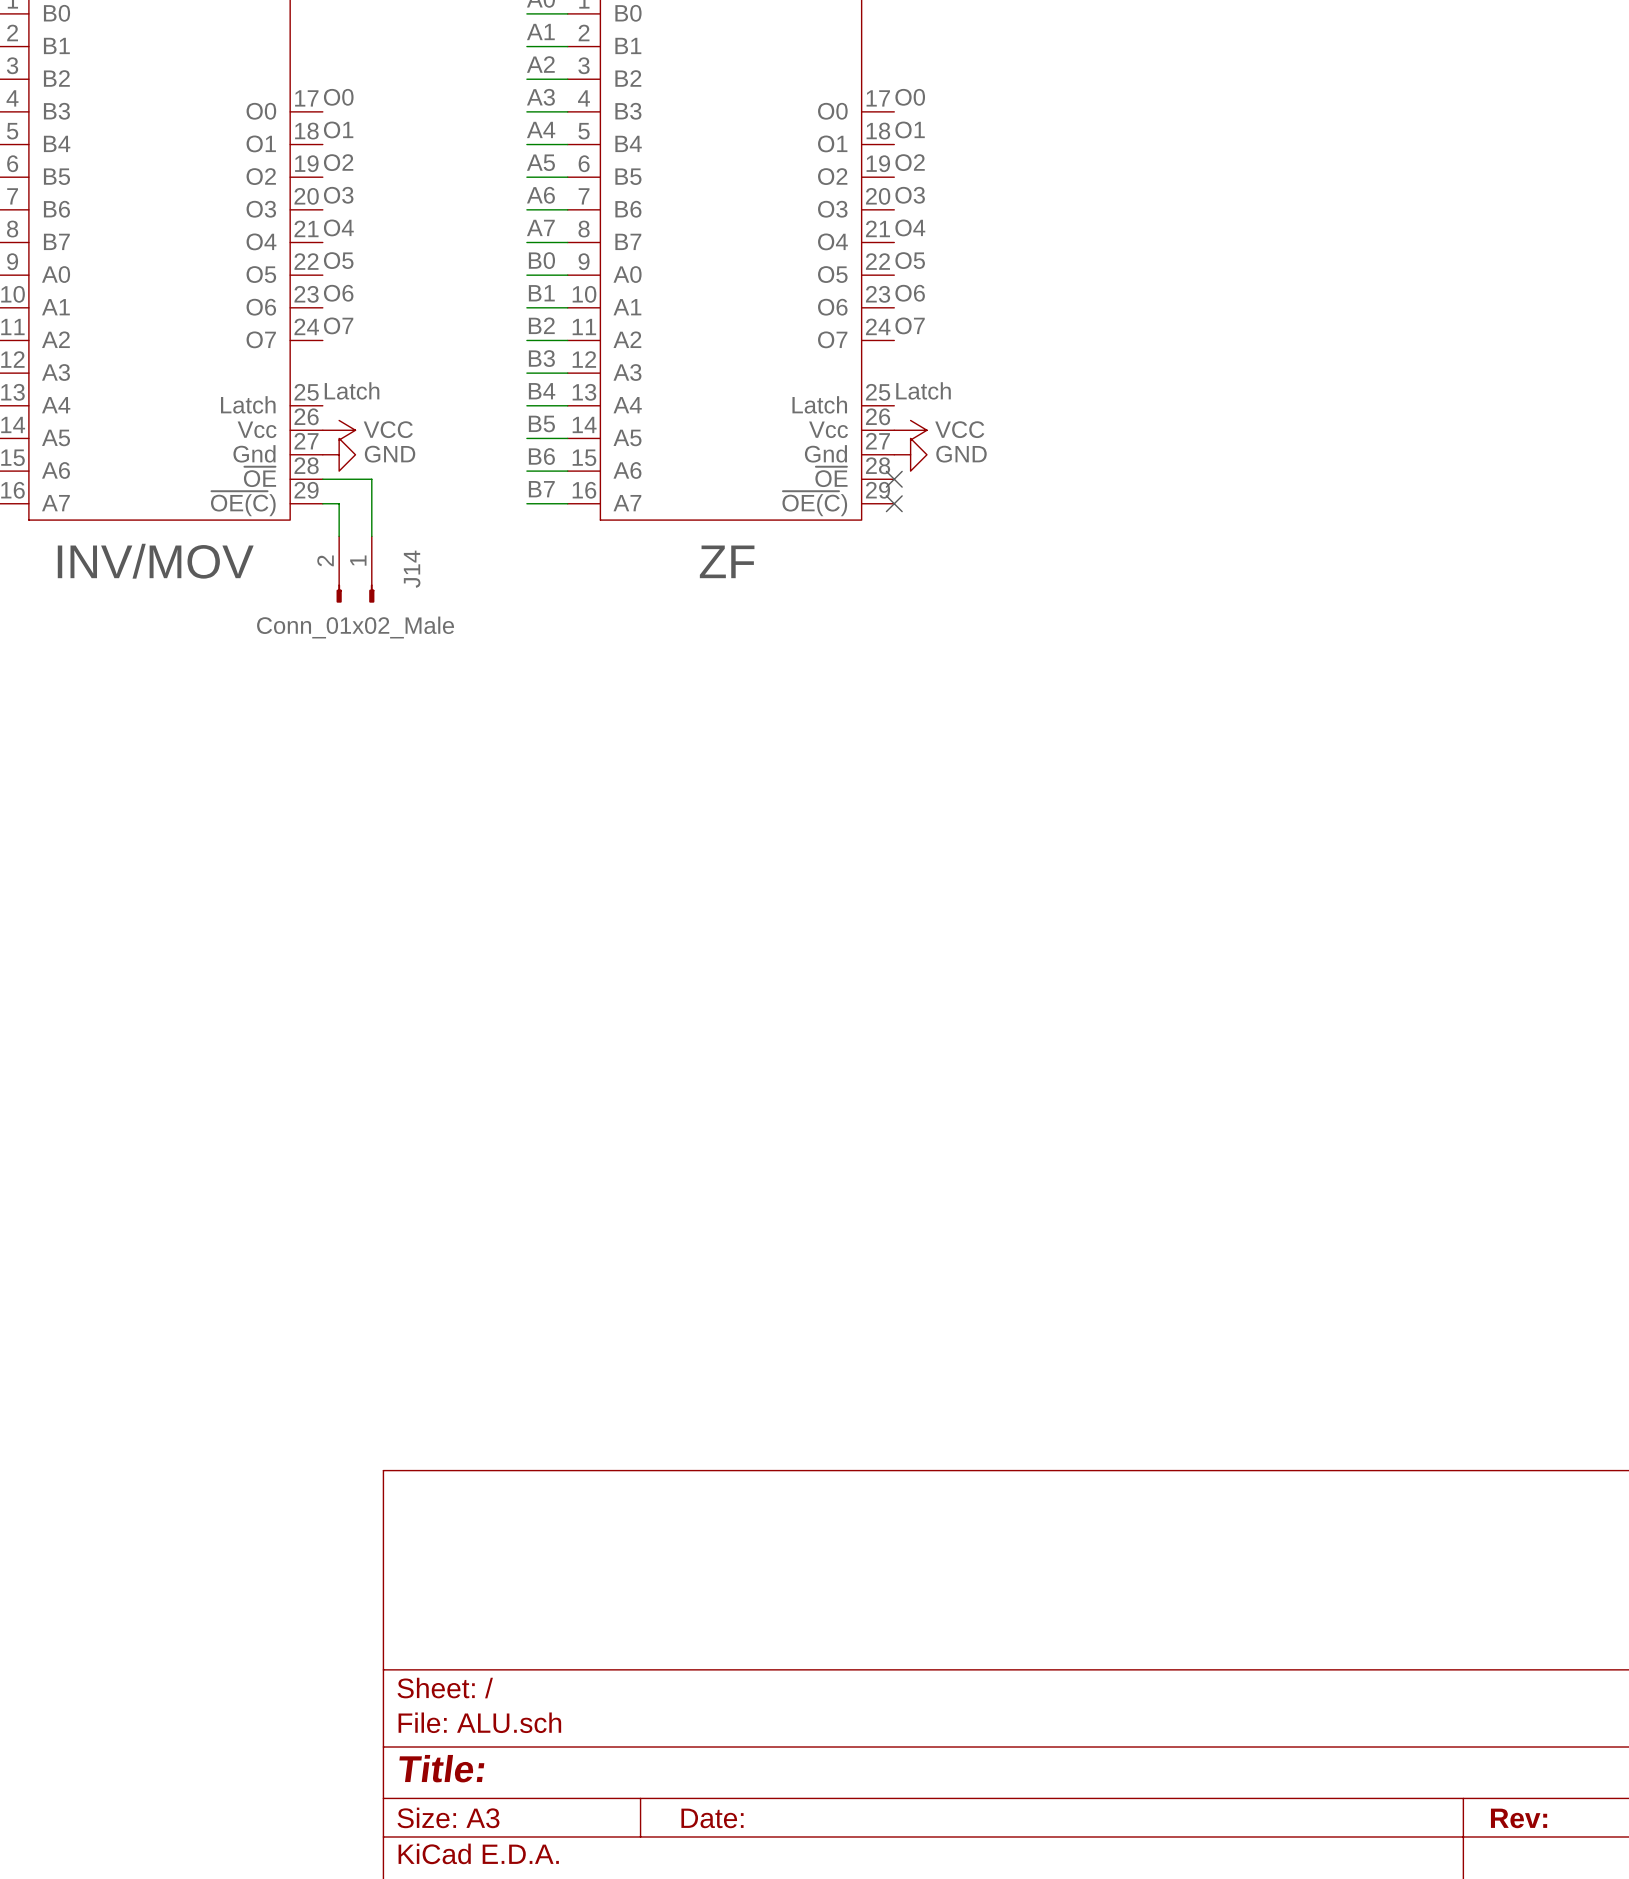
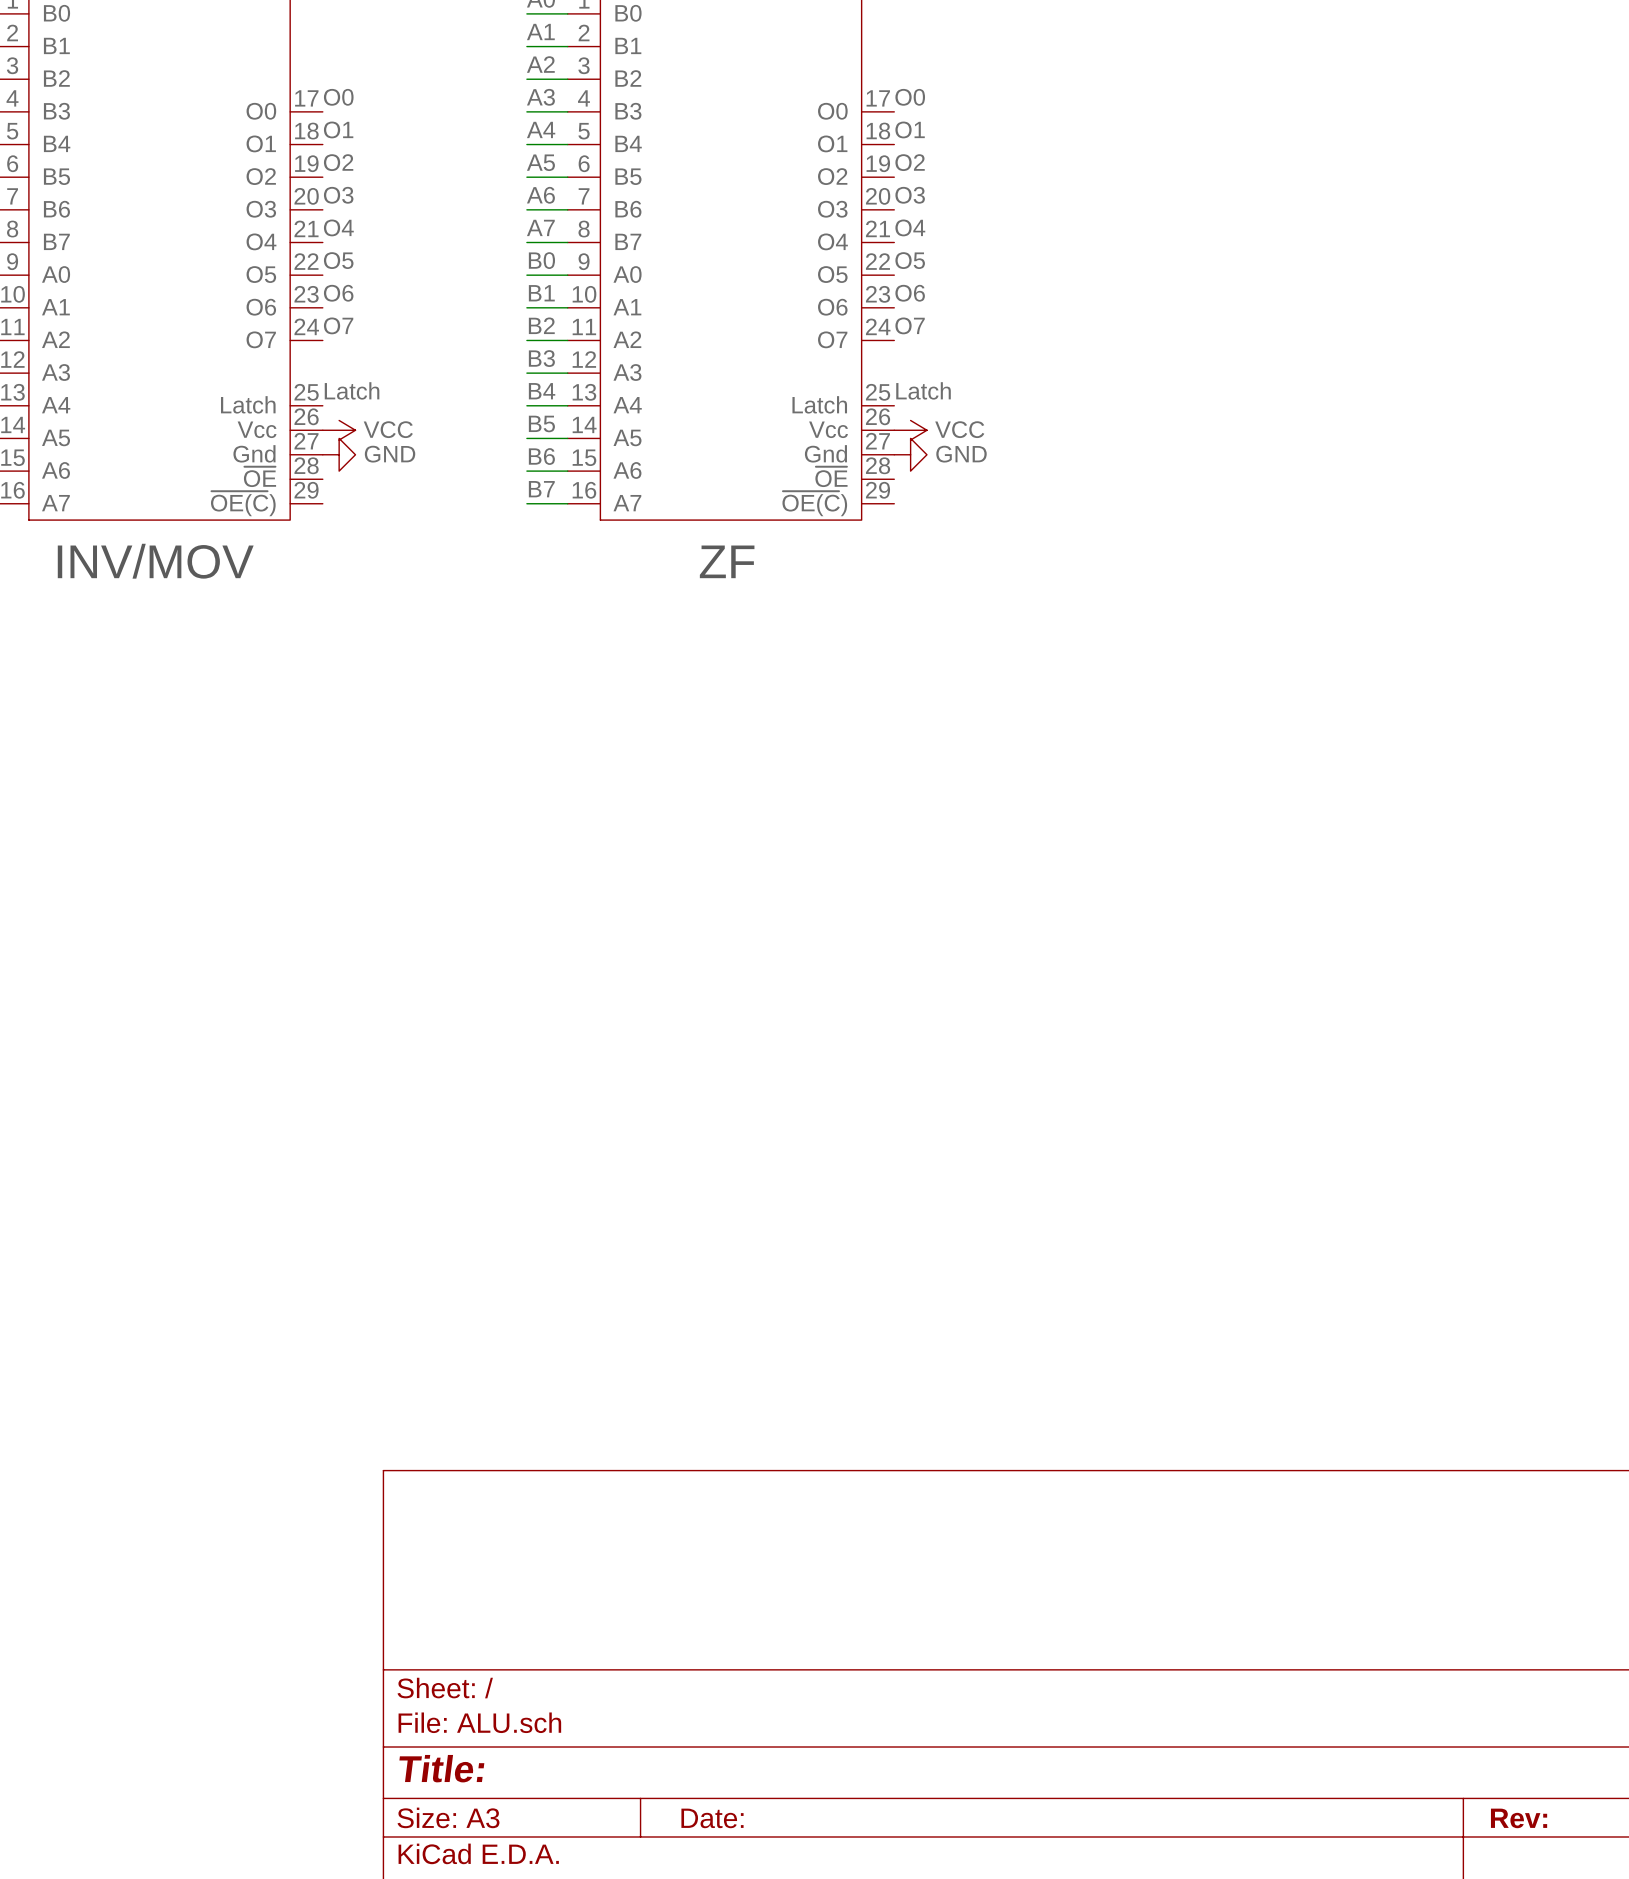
wire: (322, 479) (371, 479) (371, 536) -> none
no-connect mark: (894, 479) -> none
wire: (322, 503) (339, 503) (339, 536) -> none
no-connect mark: (894, 503) -> none
J14: Conn_01x02_Male (355, 569) -> none

